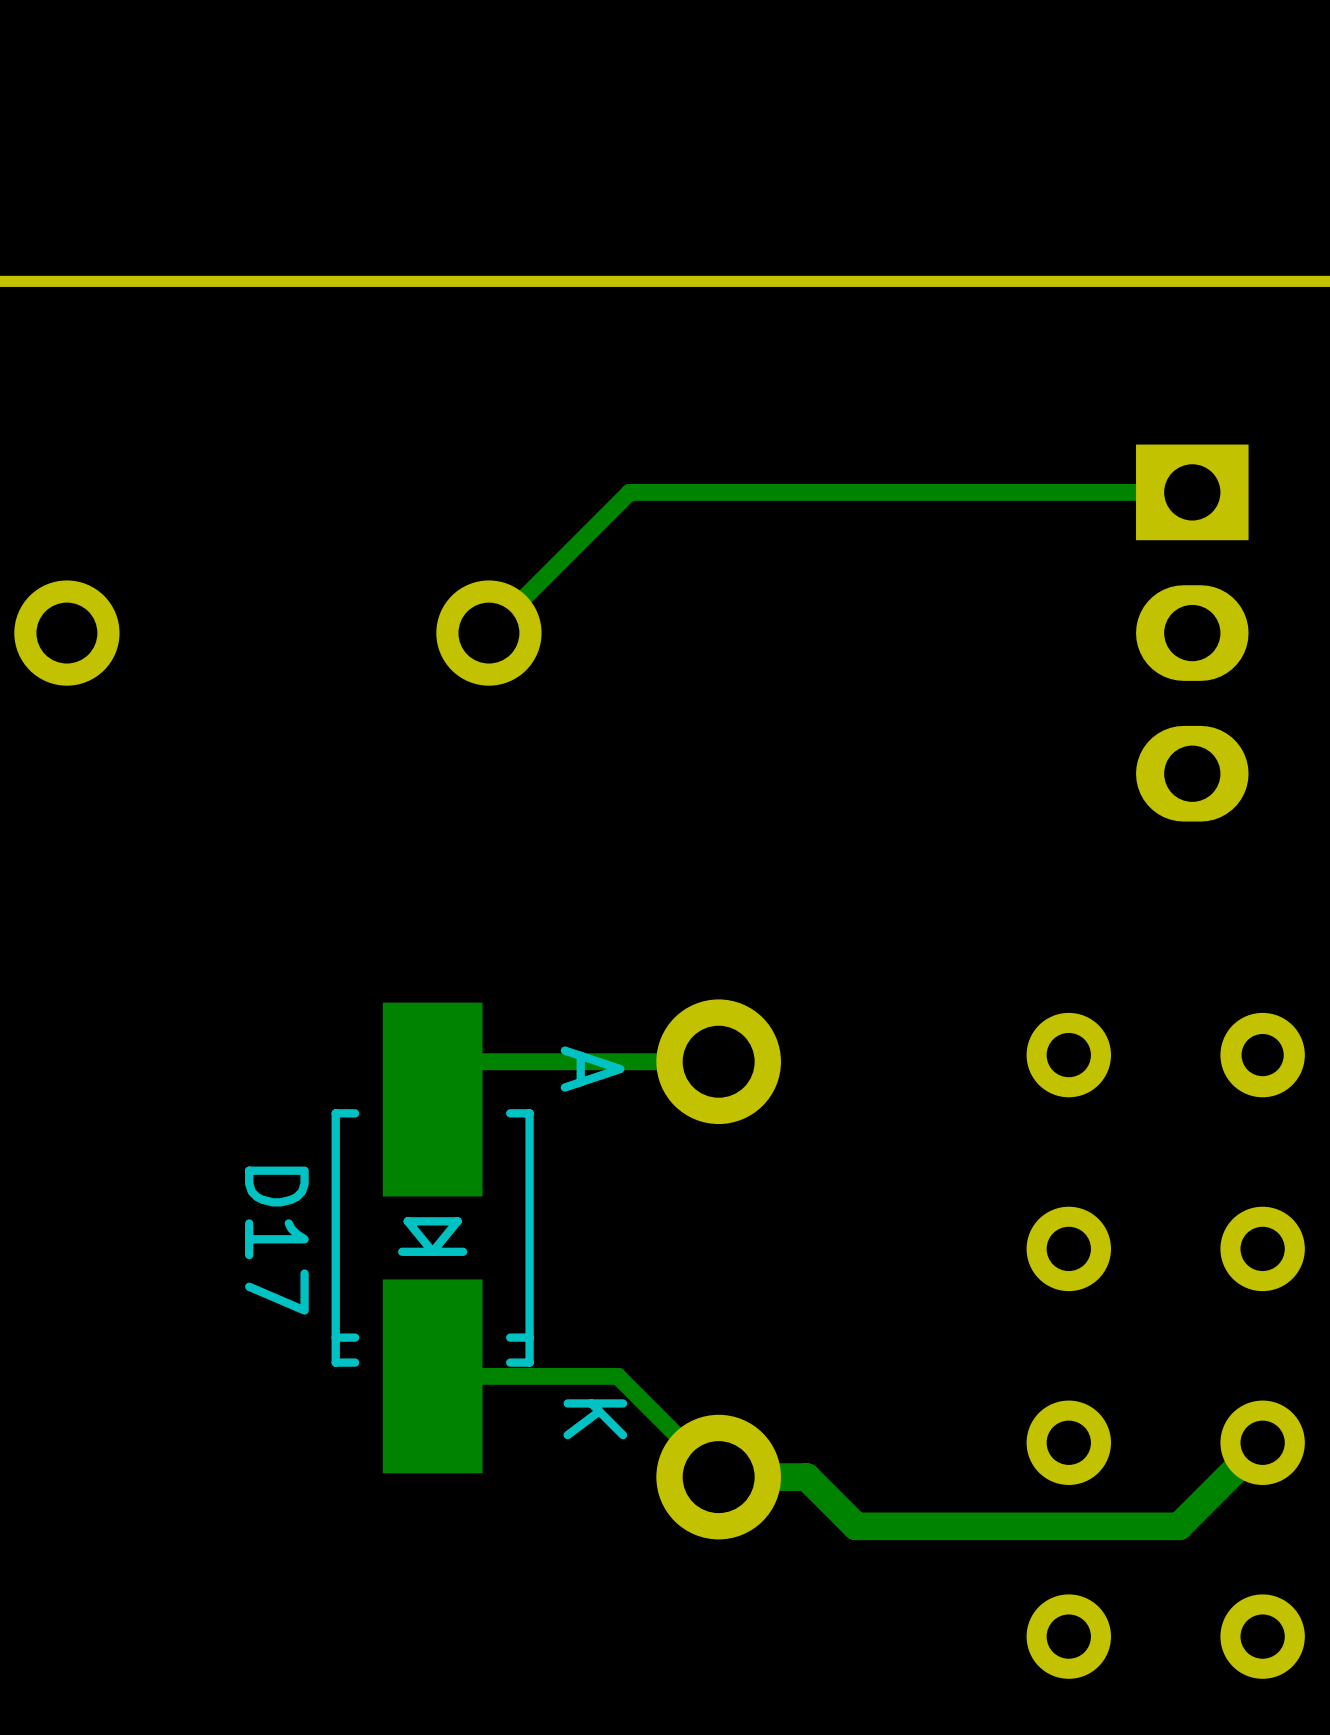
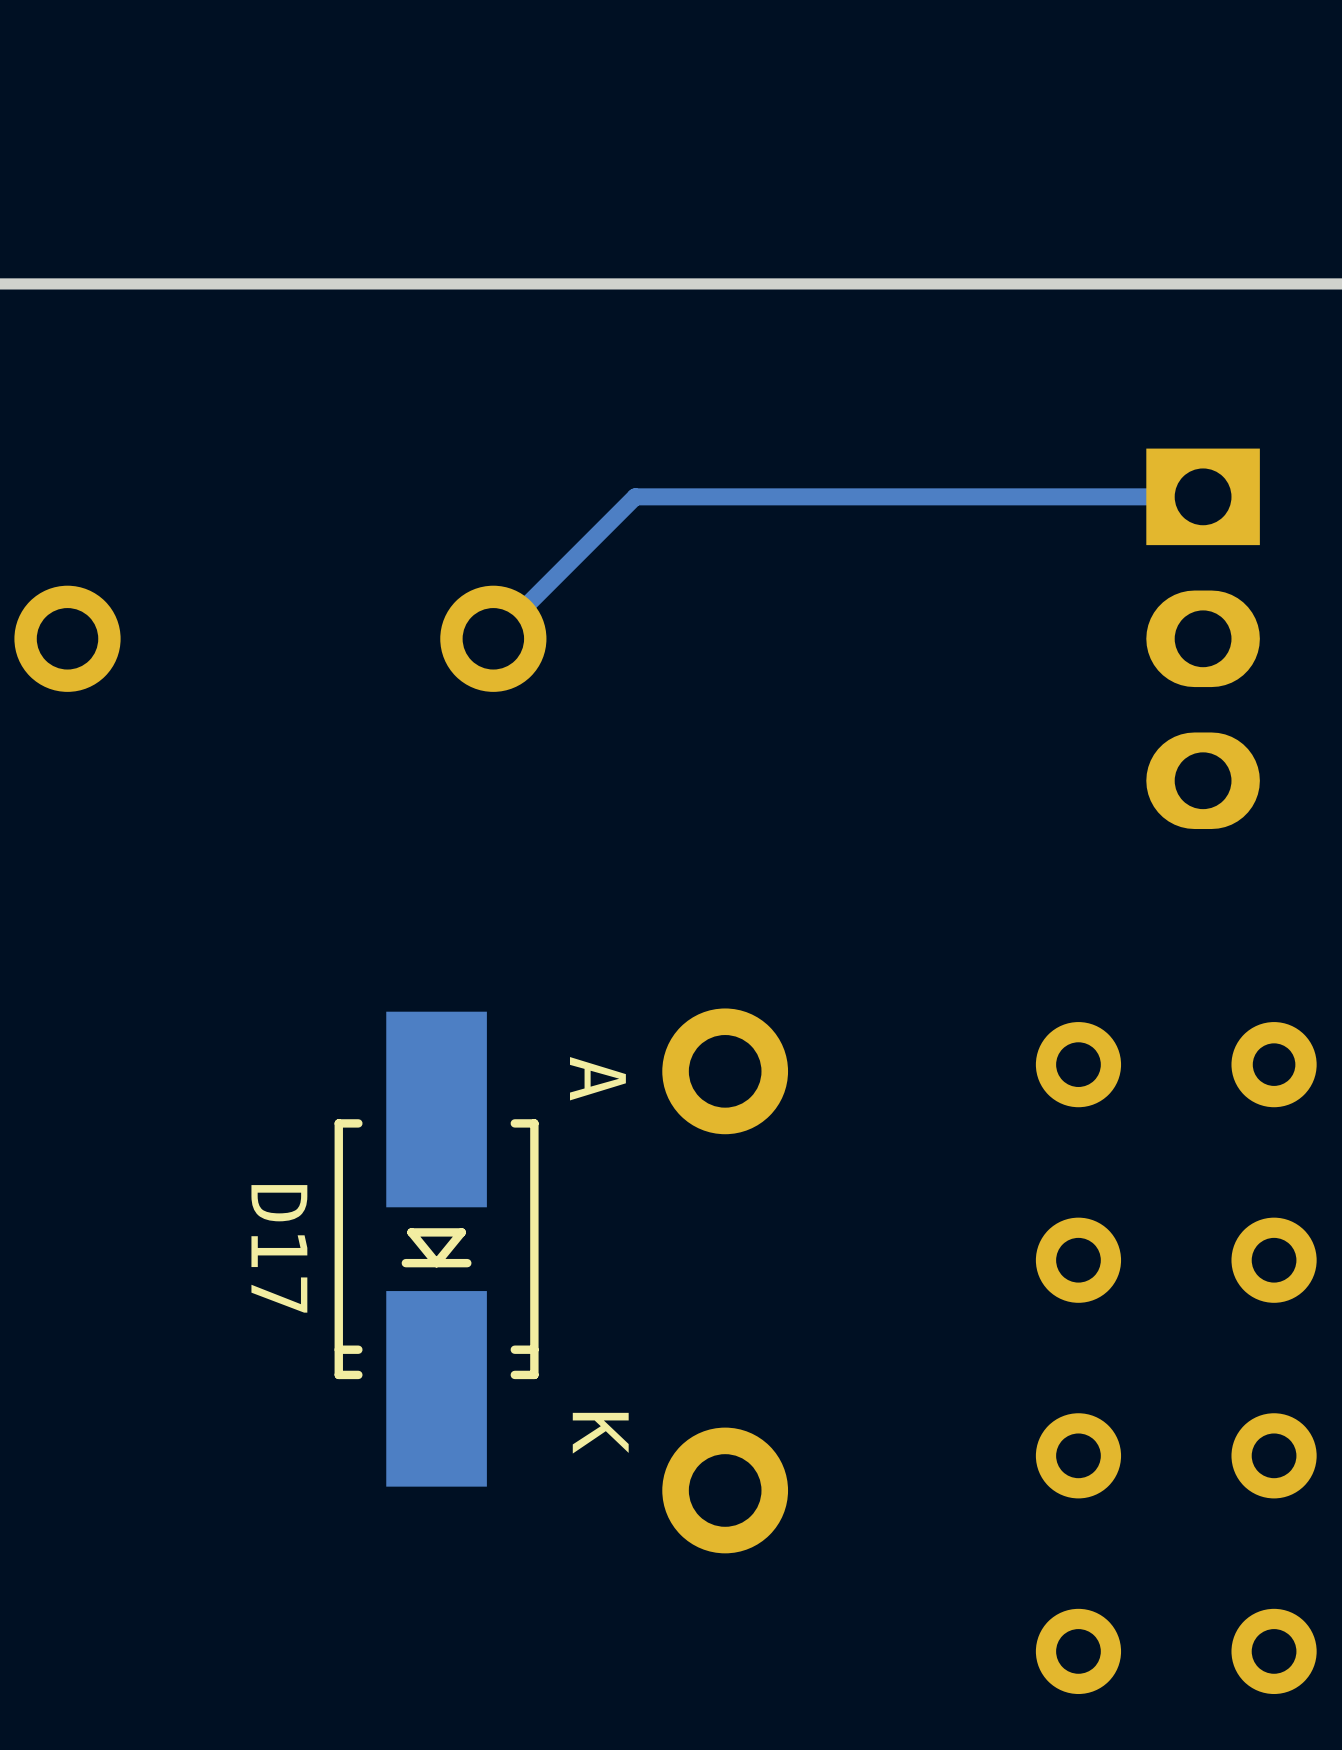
track: (718, 1061) (470, 1061) (432, 1099) -> none
track: (432, 1376) (617, 1376) (718, 1477) (806, 1477) (856, 1526) (1179, 1526) (1262, 1442) -> none

